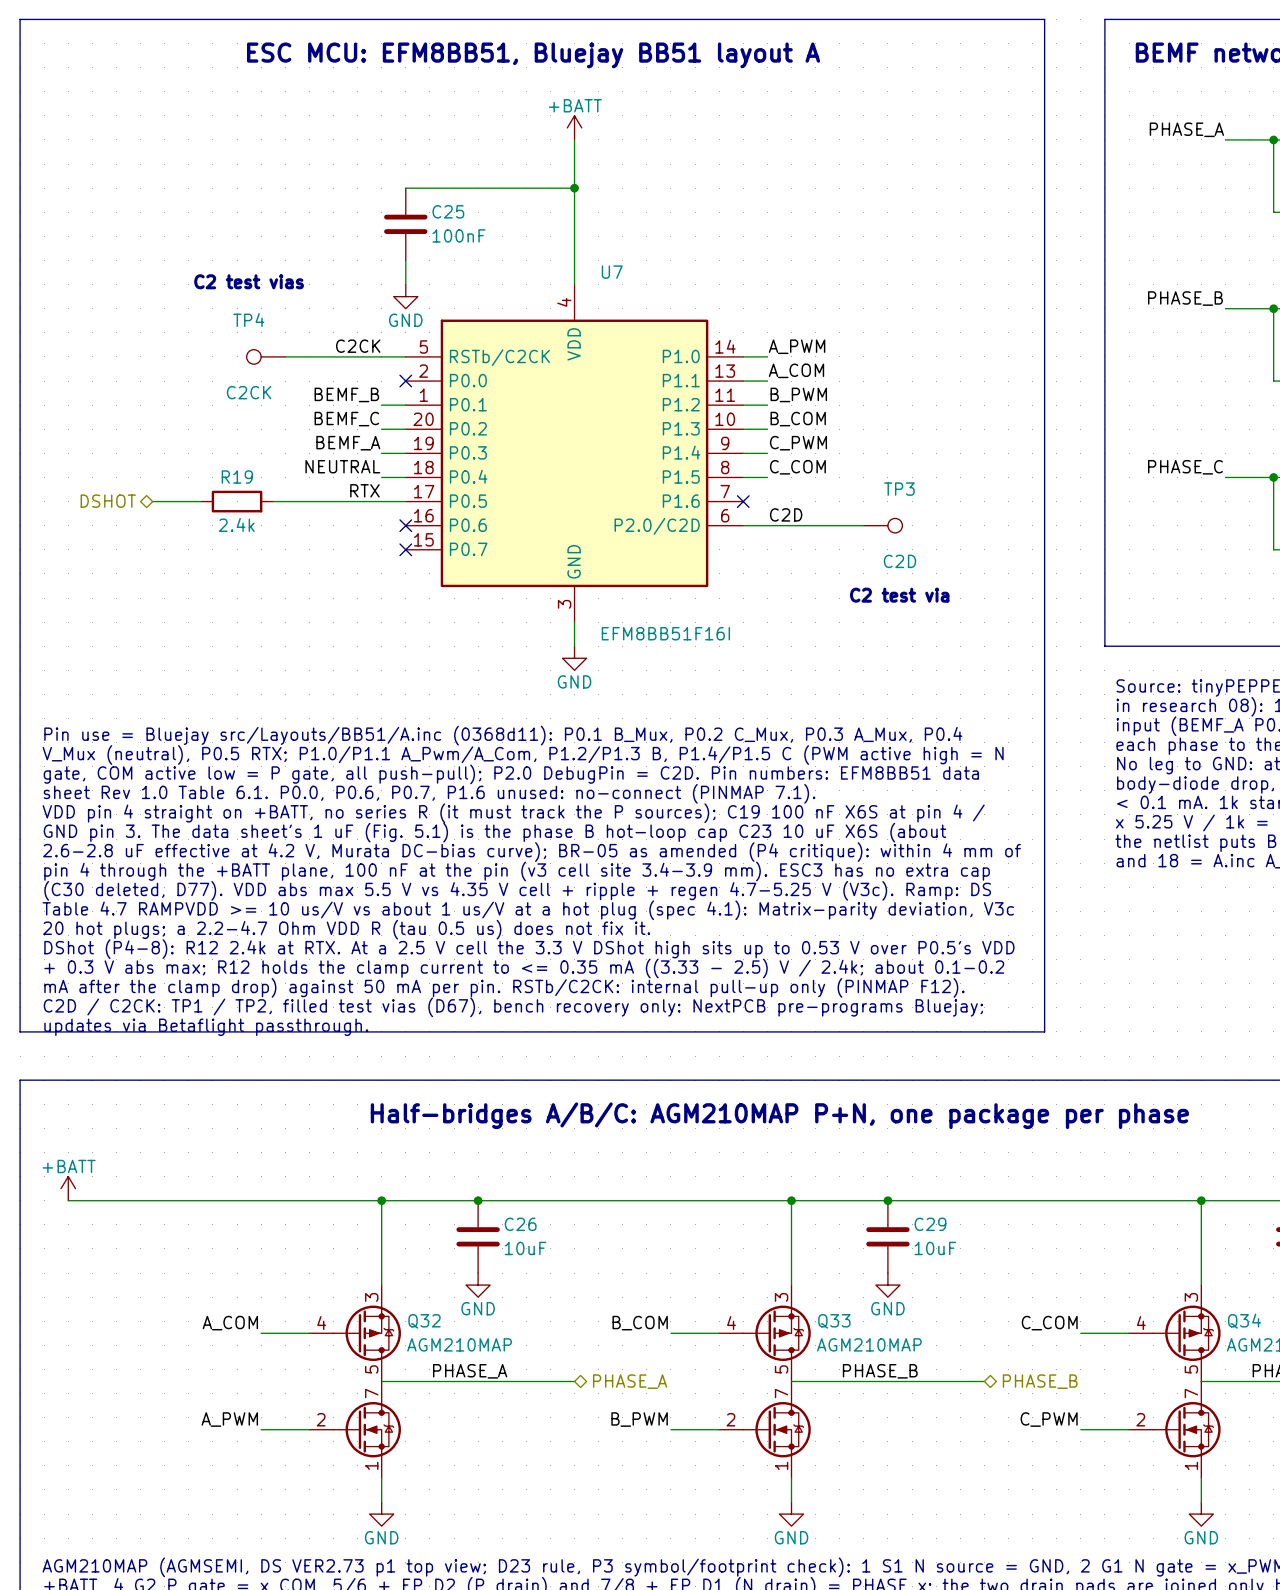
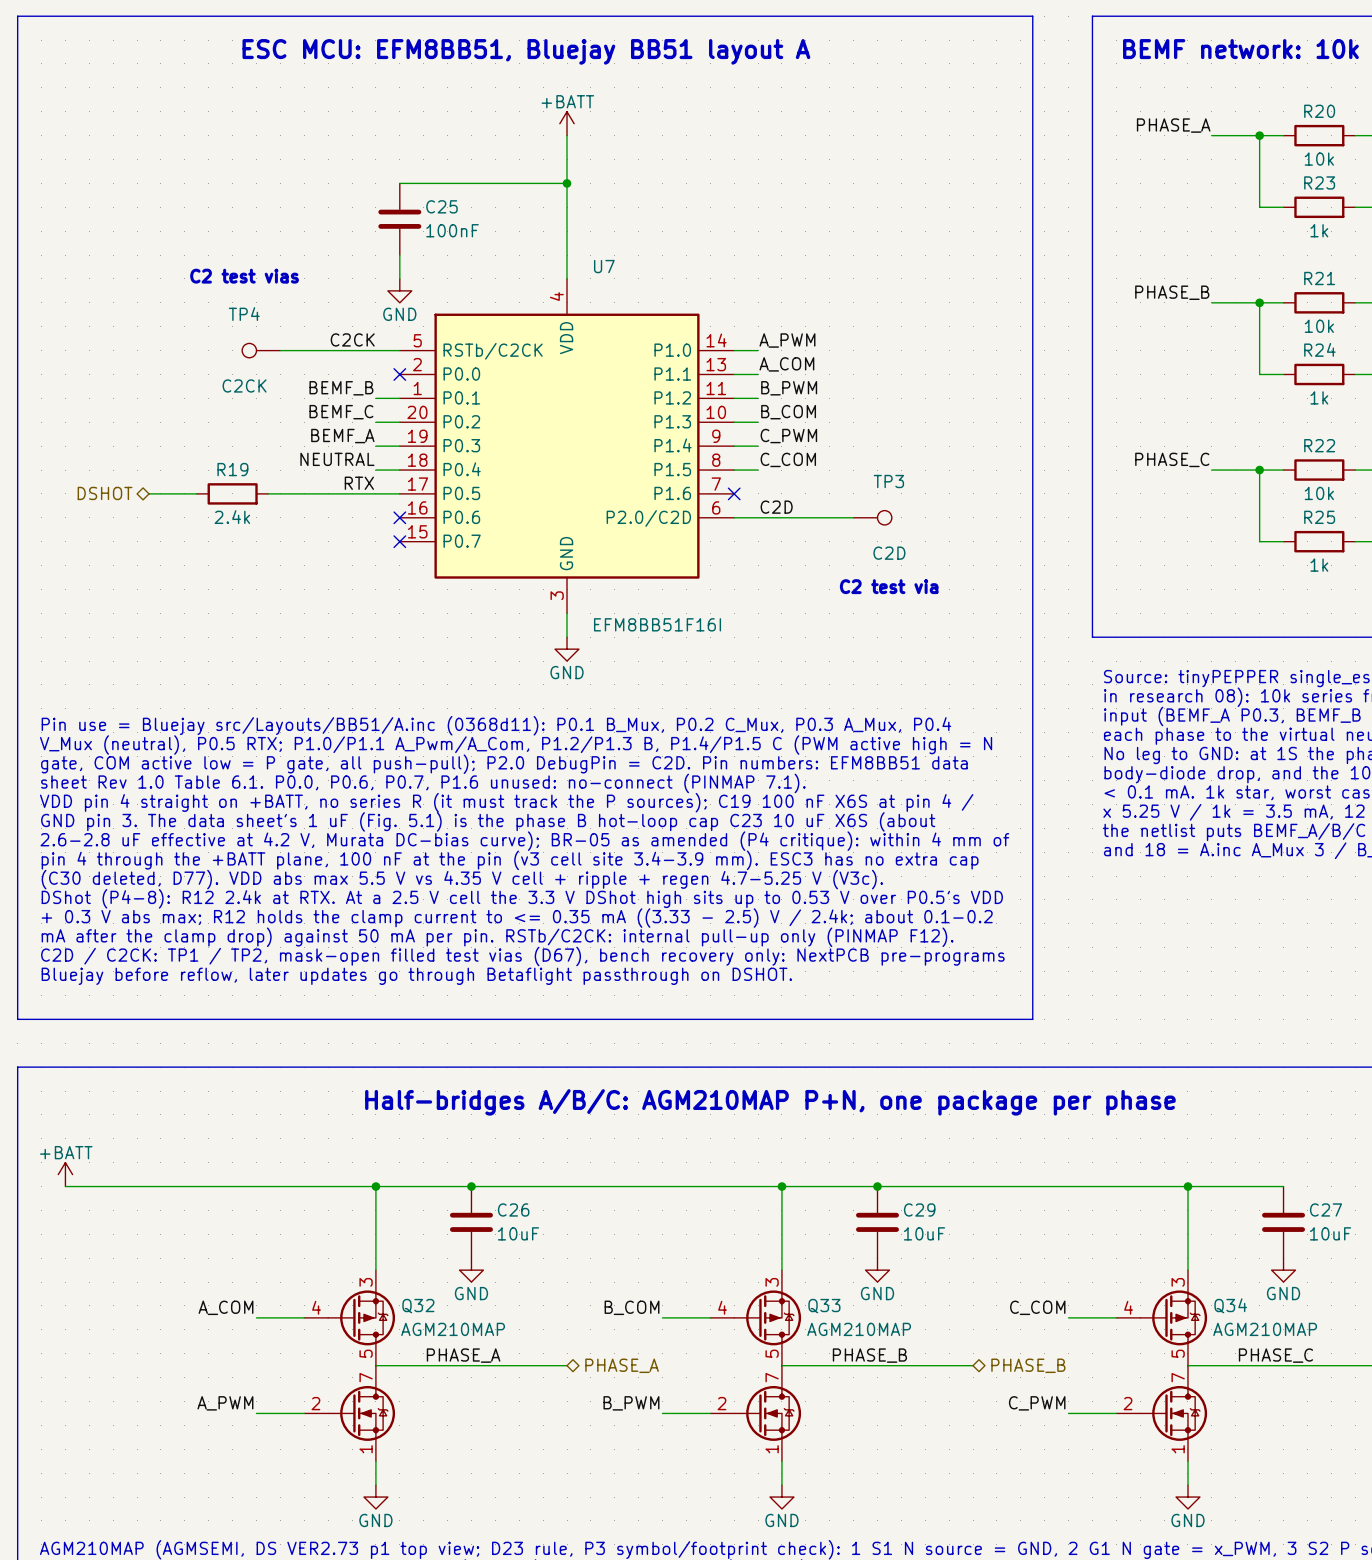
text: (C30 deleted, D77). VDD abs max 5.5 V vs 4.35 V cell + ripple + regen 4.7-5.25 V (V3c). Ramp: DS (517, 890) -> (C30 deleted, D77). VDD abs max 5.5 V vs 4.35 V cell + ripple + regen 4.7-5.25 V (V3c). (462, 879)
text: Table 4.7 RAMPVDD >= 10 us/V vs about 1 us/V at a hot plug (spec 4.1): Matrix-parity deviation, V3c (528, 910) -> DShot (P4-8): R12 2.4k at RTX. At a 2.5 V cell the 3.3 V DShot high sits up to 0.53 V over P0.5's VDD (522, 898)
text: 20 hot plugs; a 2.2-4.7 Ohm VDD R (tau 0.5 us) does not fix it. (346, 929) -> + 0.3 V abs max; R12 holds the clamp current to <= 0.35 mA ((3.33 - 2.5) V / 2.4k; about 0.1-0.2 (517, 918)
text: DShot (P4-8): R12 2.4k at RTX. At a 2.5 V cell the 3.3 V DShot high sits up to 0.53 V over P0.5's VDD (529, 949) -> mA after the clamp drop) against 50 mA per pin. RSTb/C2CK: internal pull-up only (PINMAP F12). (497, 937)
text: + 0.3 V abs max; R12 holds the clamp current to <= 0.35 mA ((3.33 - 2.5) V / 2.4k; about 0.1-0.2 (524, 968) -> C2D / C2CK: TP1 / TP2, mask-open filled test vias (D67), bench recovery only: NextPCB pre-programs (522, 956)
text: mA after the clamp drop) against 50 mA per pin. RSTb/C2CK: internal pull-up only (PINMAP F12). (504, 987) -> Bluejay before reflow, later updates go through Betaflight passthrough on DSHOT. (416, 976)
text: C2D / C2CK: TP1 / TP2, filled test vias (D67), bench recovery only: NextPCB pre-programs Bluejay; (513, 1007) -> none
text: updates via Betaflight passthrough. (206, 1027) -> none

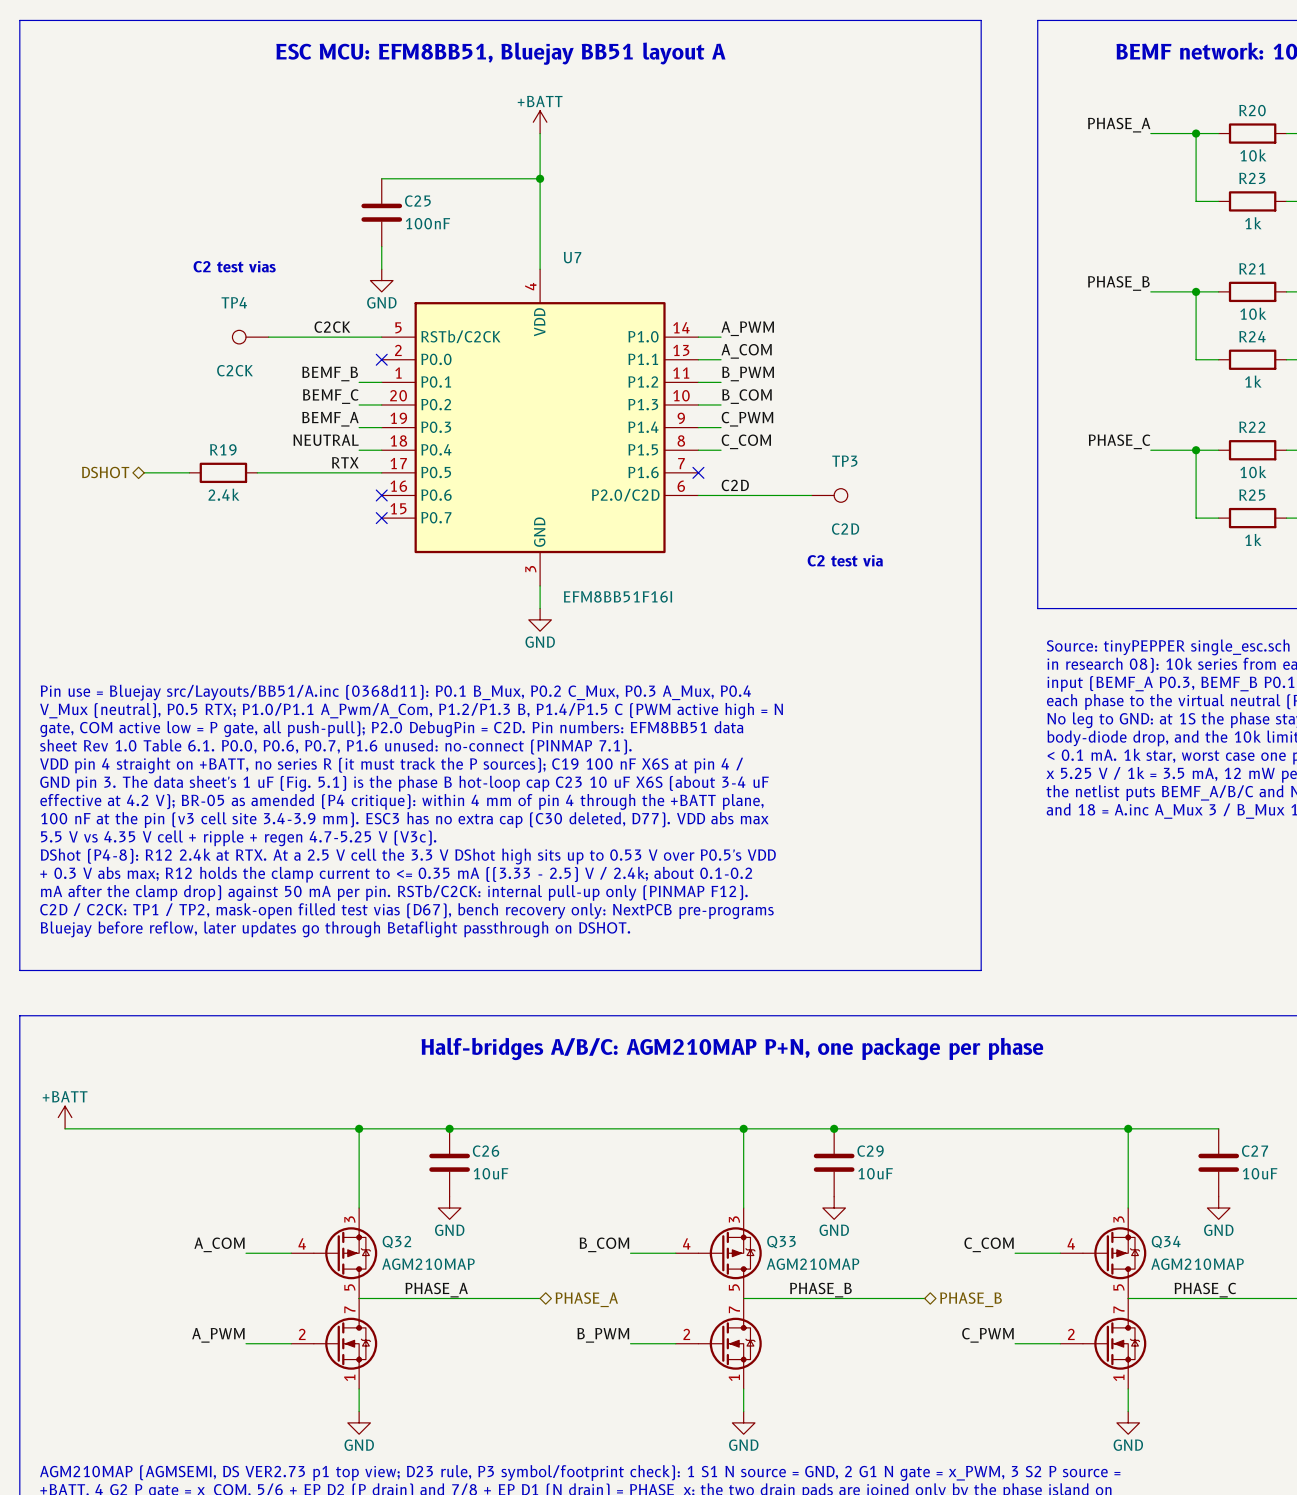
text: GND pin 3. The data sheet's 1 uF (Fig. 5.1) is the phase B hot-loop cap C23 10 uF X6S (about (488, 821) -> GND pin 3. The data sheet's 1 uF (Fig. 5.1) is the phase B hot-loop cap C23 10 uF X6S (about 3-4 uF (404, 783)
text: 2.6-2.8 uF effective at 4.2 V, Murata DC-bias curve); BR-05 as amended (P4 critique): within 4 mm of (524, 841) -> effective at 4.2 V); BR-05 as amended (P4 critique): within 4 mm of pin 4 through the +BATT plane, (401, 801)
text: pin 4 through the +BATT plane, 100 nF at the pin (v3 cell site 3.4-3.9 mm). ESC3 has no extra cap (510, 860) -> 100 nF at the pin (v3 cell site 3.4-3.9 mm). ESC3 has no extra cap (C30 deleted, D77). VDD abs max (404, 820)
text: (C30 deleted, D77). VDD abs max 5.5 V vs 4.35 V cell + ripple + regen 4.7-5.25 V (V3c). (462, 879) -> 5.5 V vs 4.35 V cell + ripple + regen 4.7-5.25 V (V3c). (238, 838)

